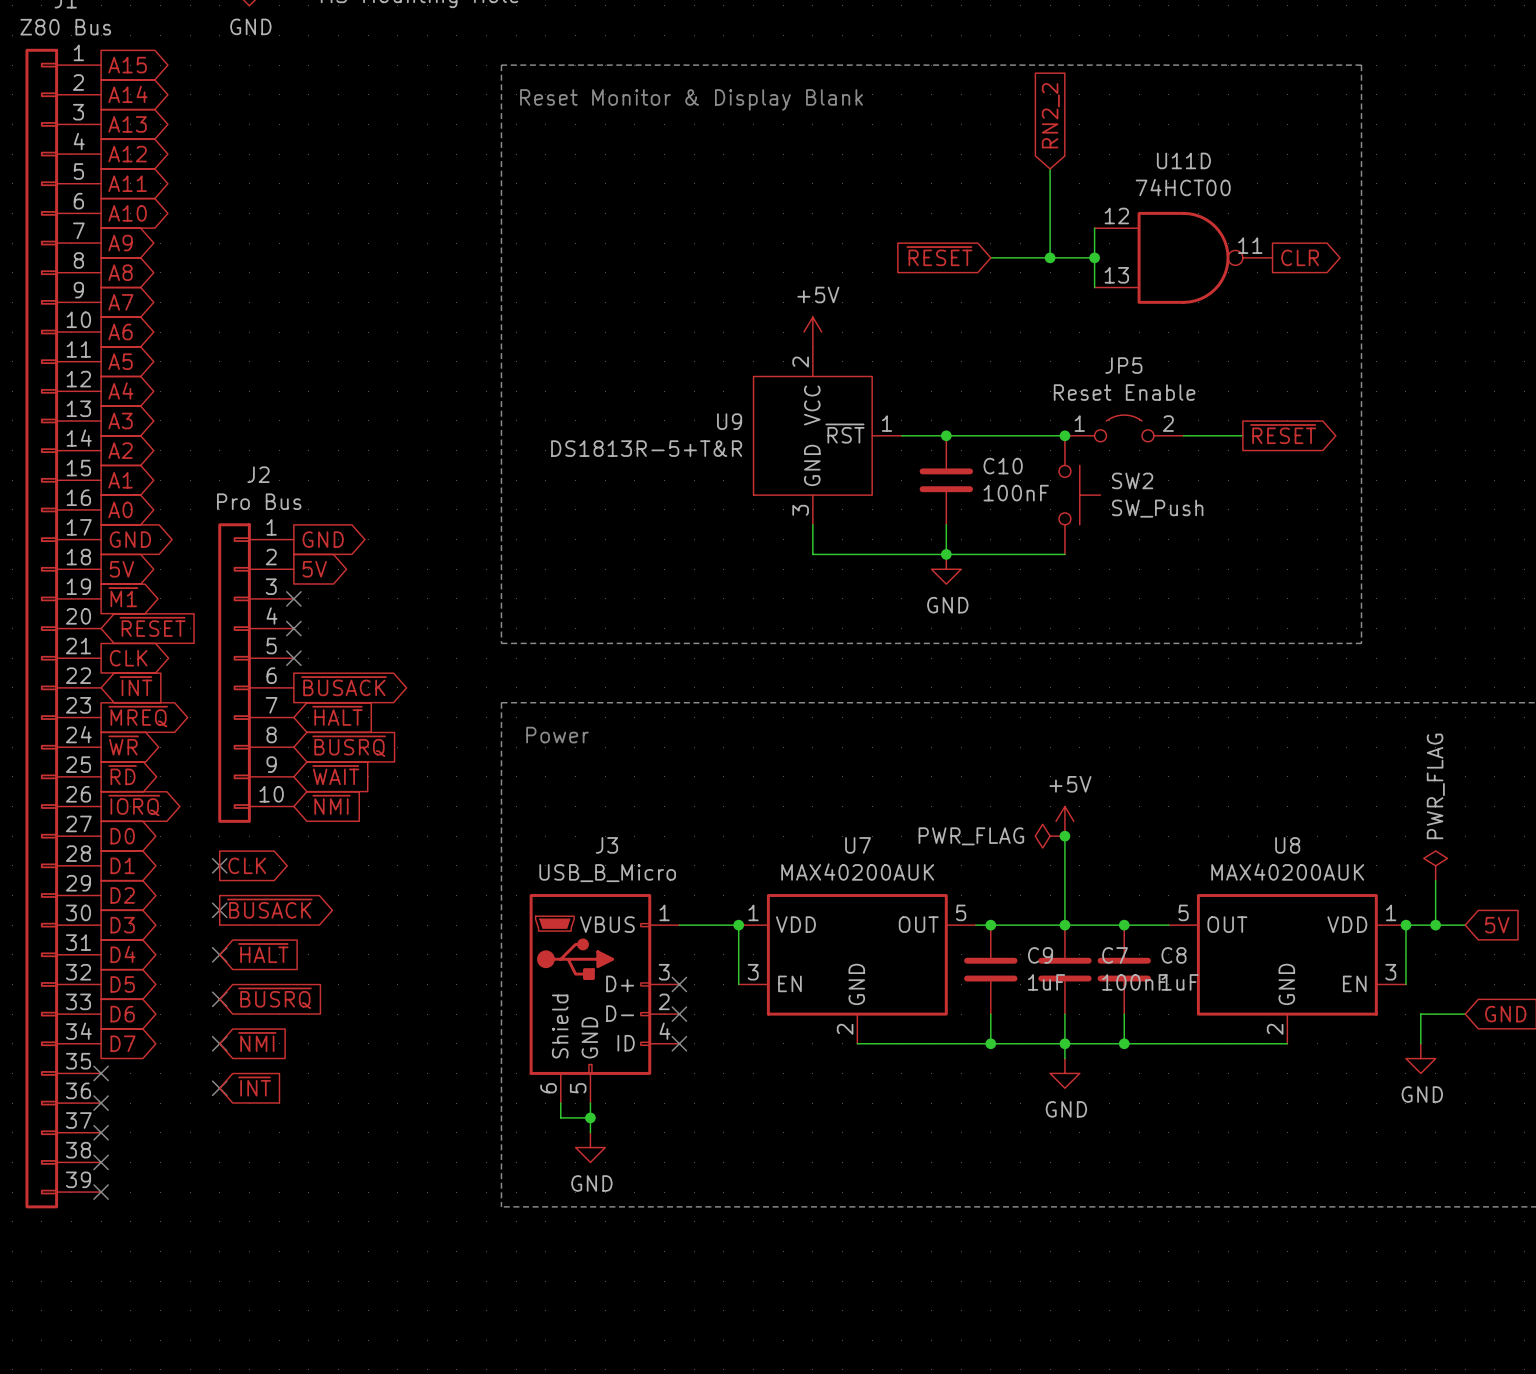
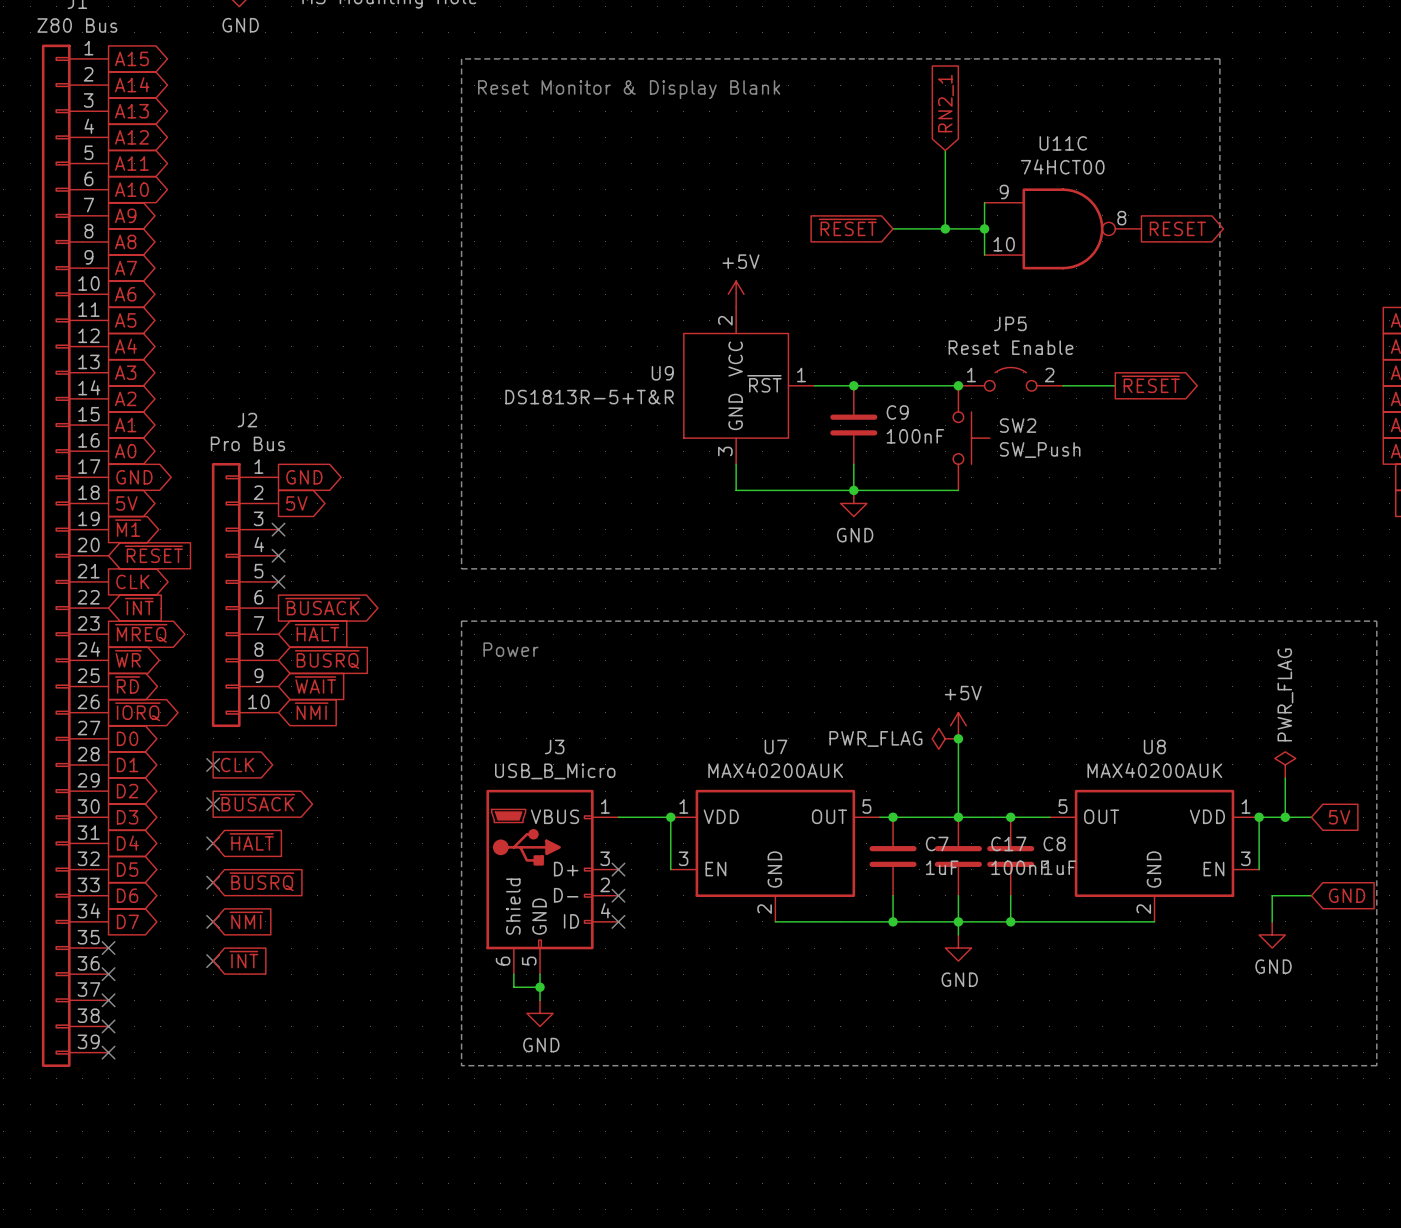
global label: RN2_2 (1050, 115) -> RN2_1 (945, 103)
U11D name: U11D (1183, 160) -> U11C (1063, 143)
U11D pin number: 12 (1116, 215) -> 9 (1004, 191)
U11D pin number: 11 (1250, 245) -> 8 (1121, 218)
global label: CLR (1300, 257) -> RESET (1177, 228)
U11D pin number: 13 (1116, 275) -> 10 (1004, 244)
C10 name: C10 (1003, 466) -> C9 (897, 412)
C9 name: C9 (1040, 955) -> C7 (937, 843)
C7 name: C7 (1115, 955) -> C17 (1008, 843)

